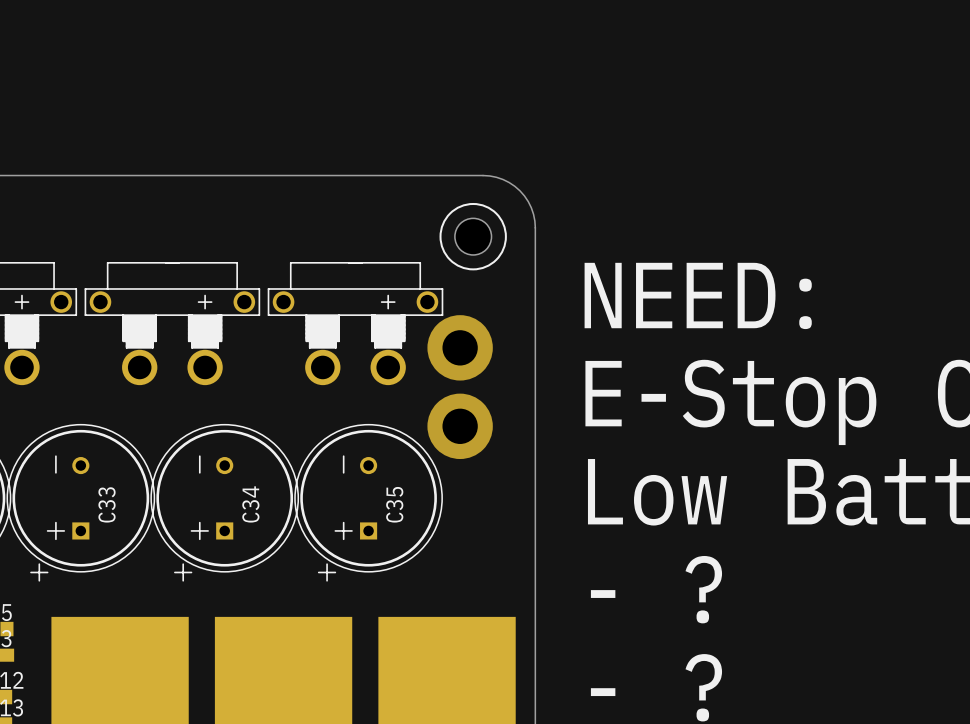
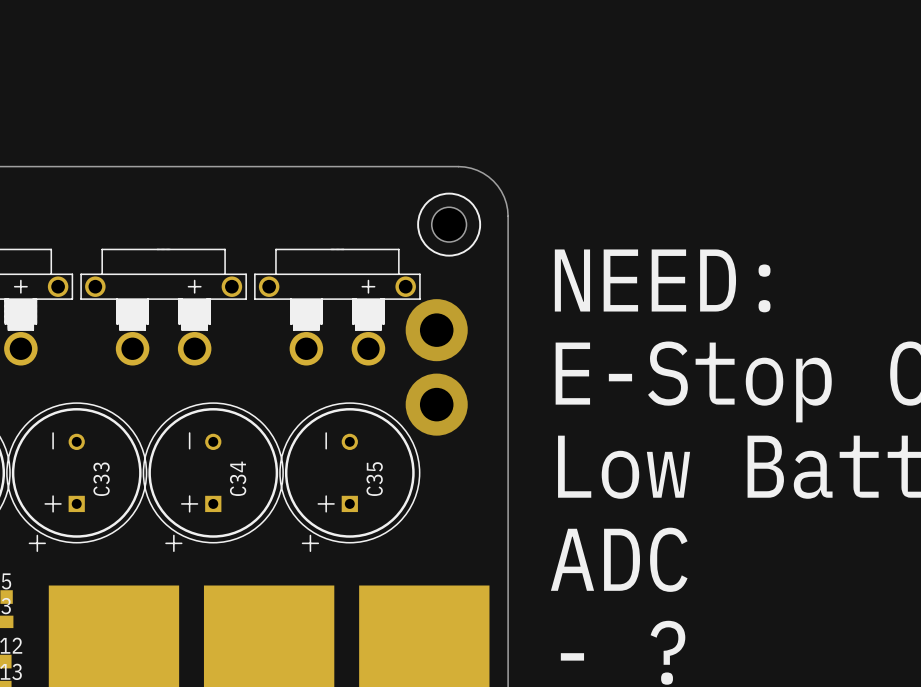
text: - ? (656, 589) -> ADC (619, 559)

